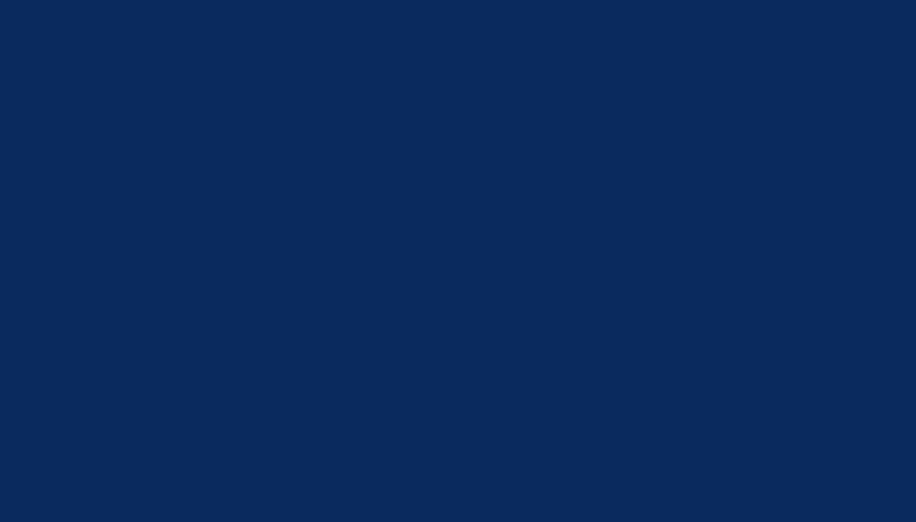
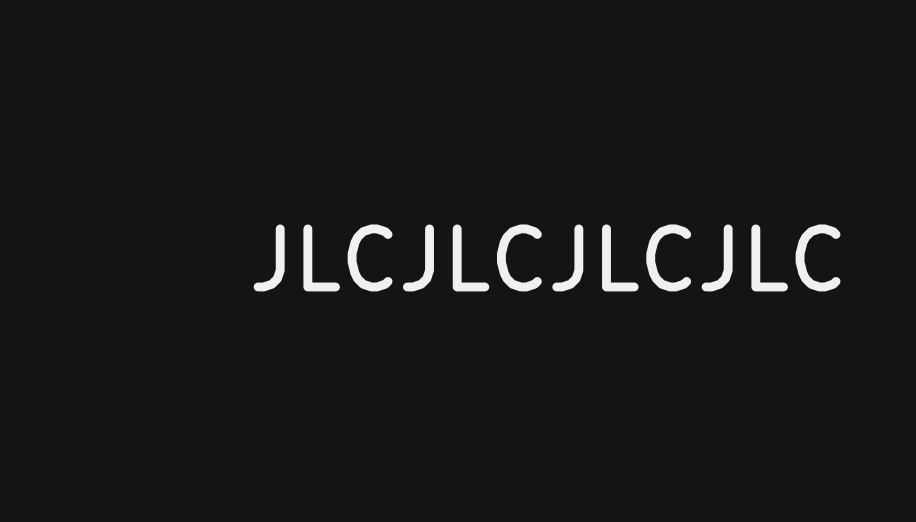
text: none -> JLCJLCJLCJLC (547, 257)

